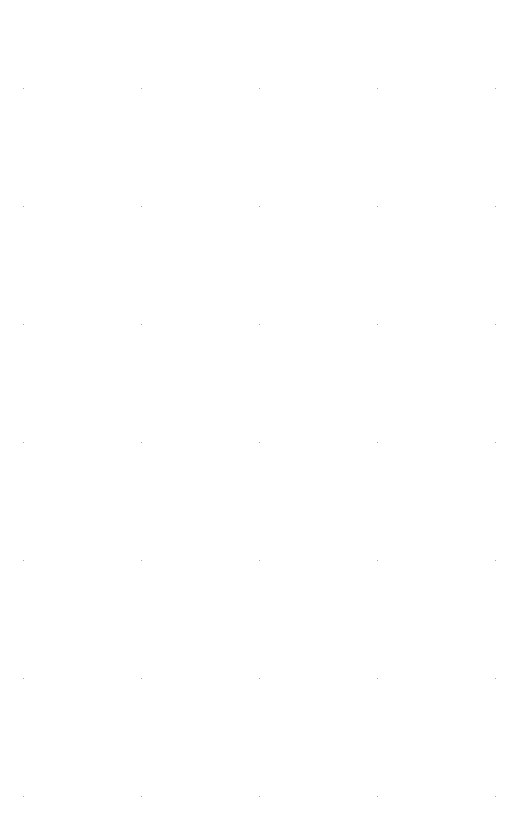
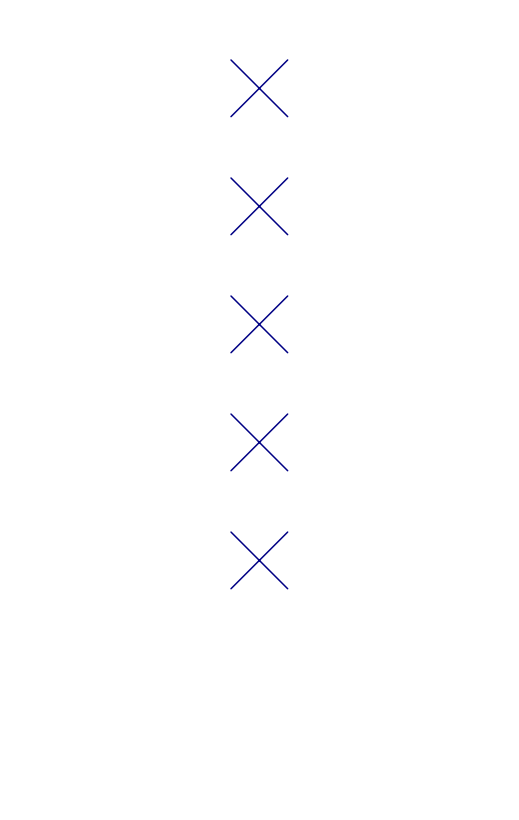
no-connect mark: none -> (259, 88)
no-connect mark: none -> (259, 206)
no-connect mark: none -> (259, 324)
no-connect mark: none -> (259, 442)
no-connect mark: none -> (259, 560)

